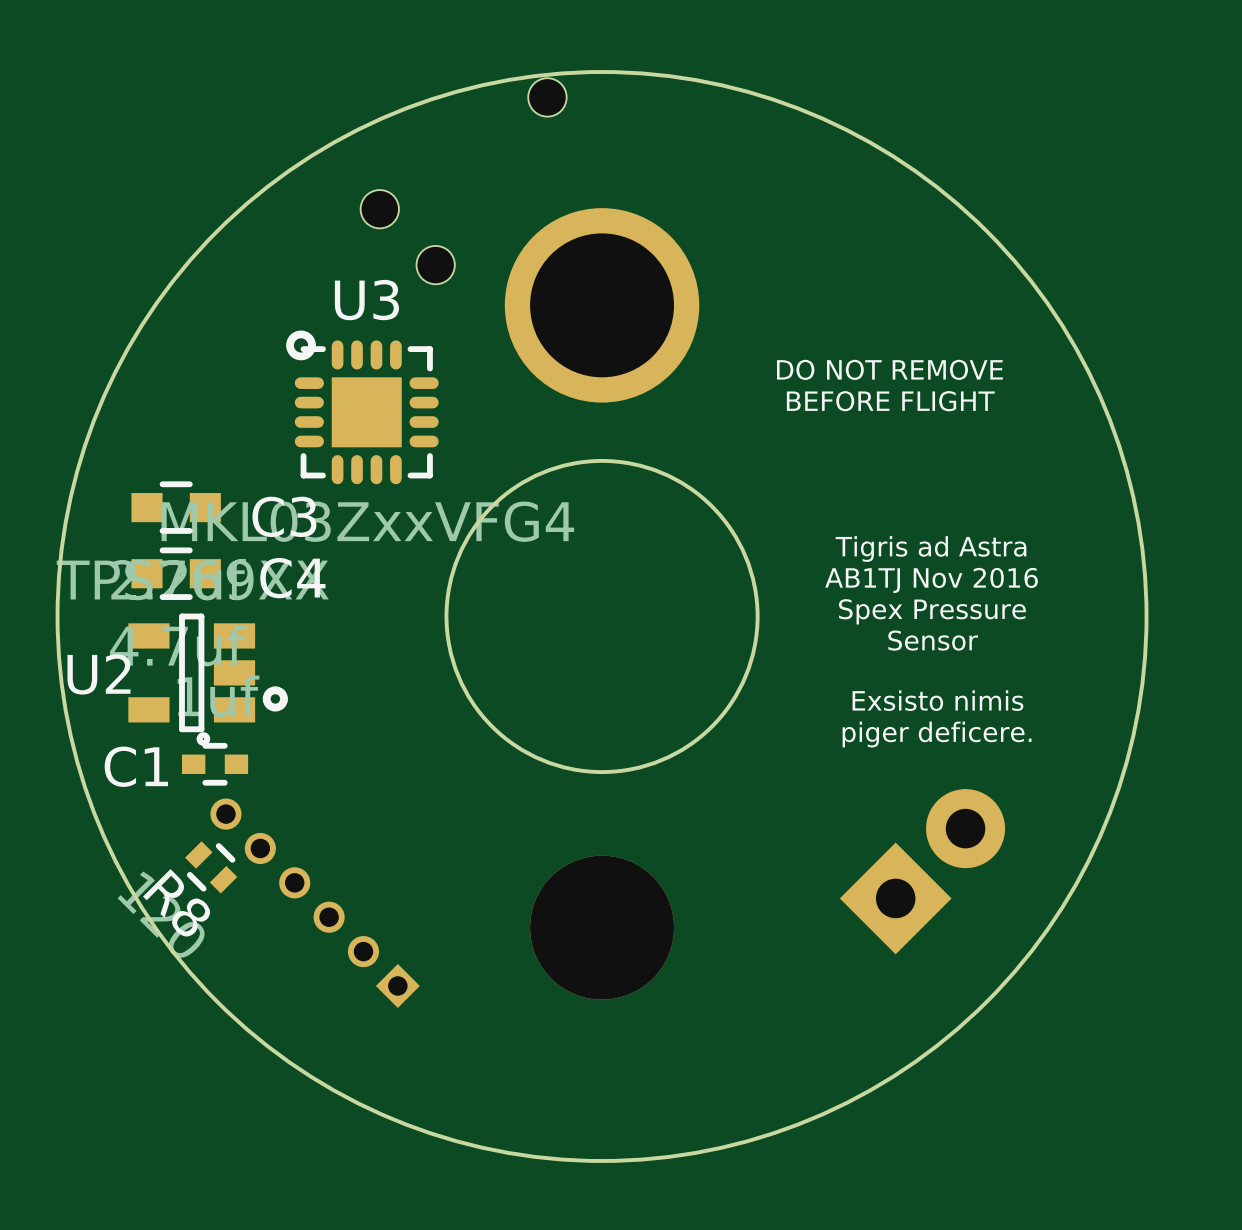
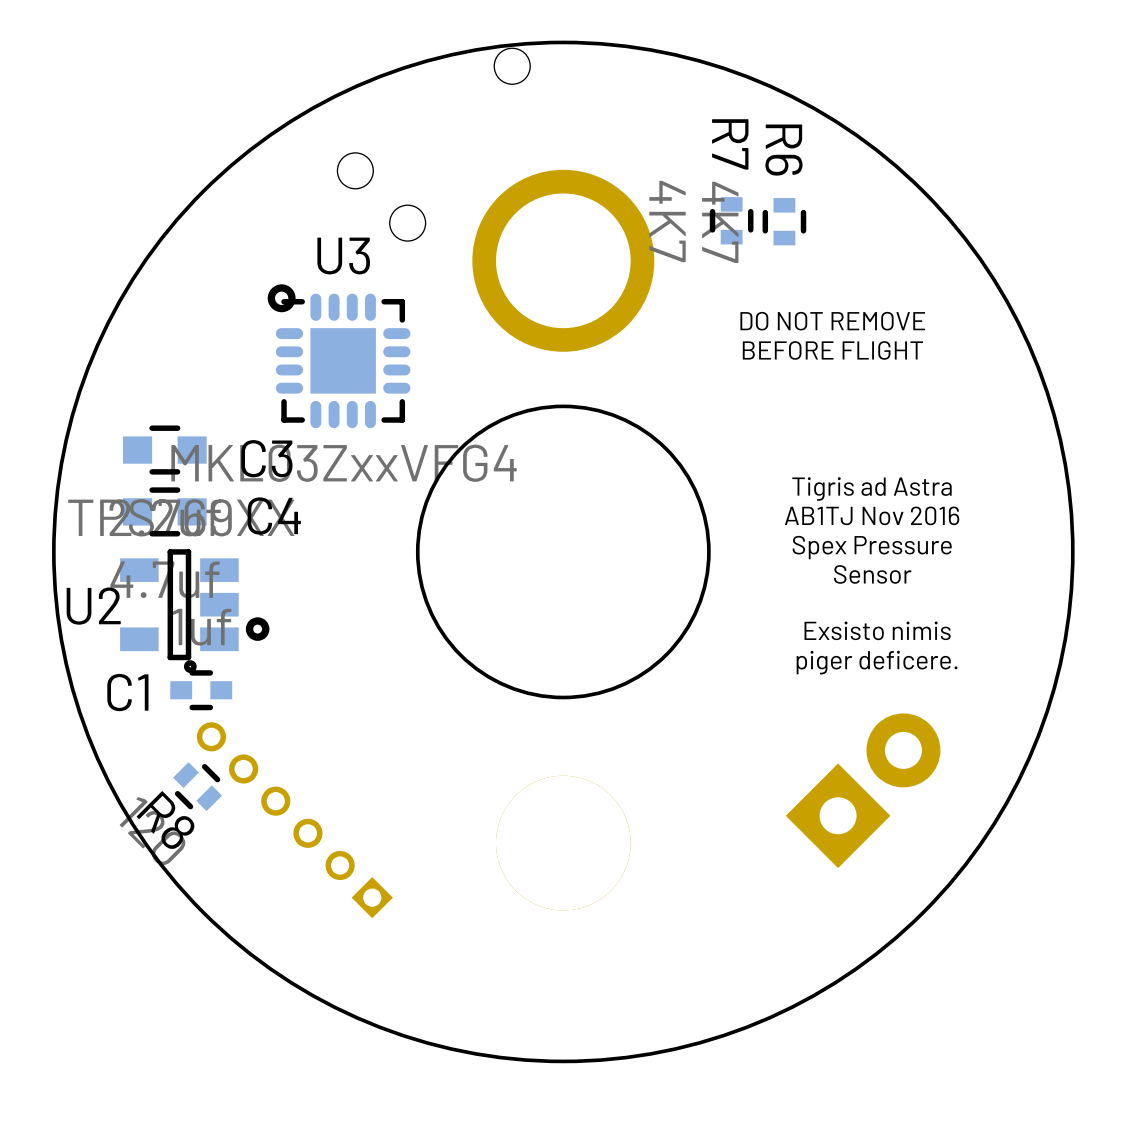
R7: none -> 4K7 (731, 220)
R6: none -> 4K7 (784, 221)

